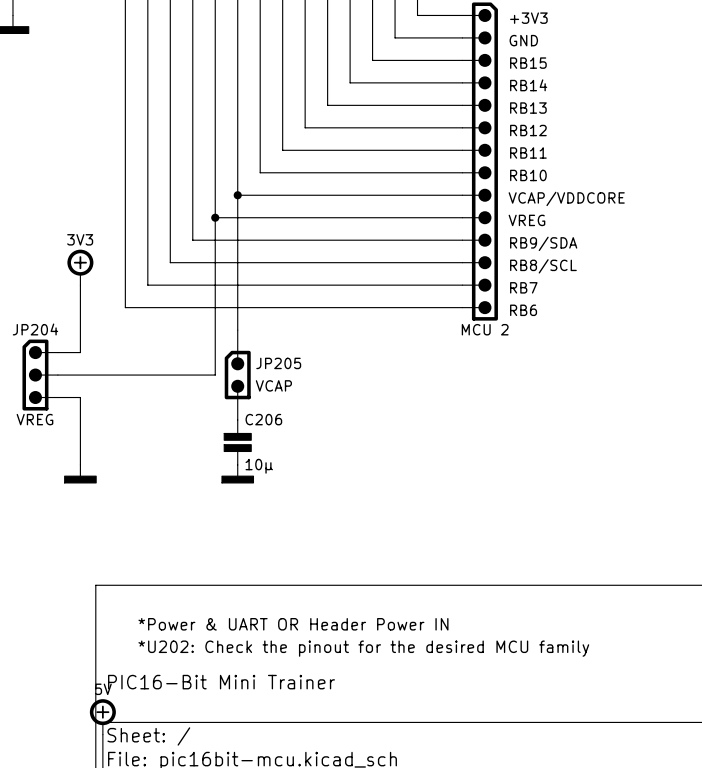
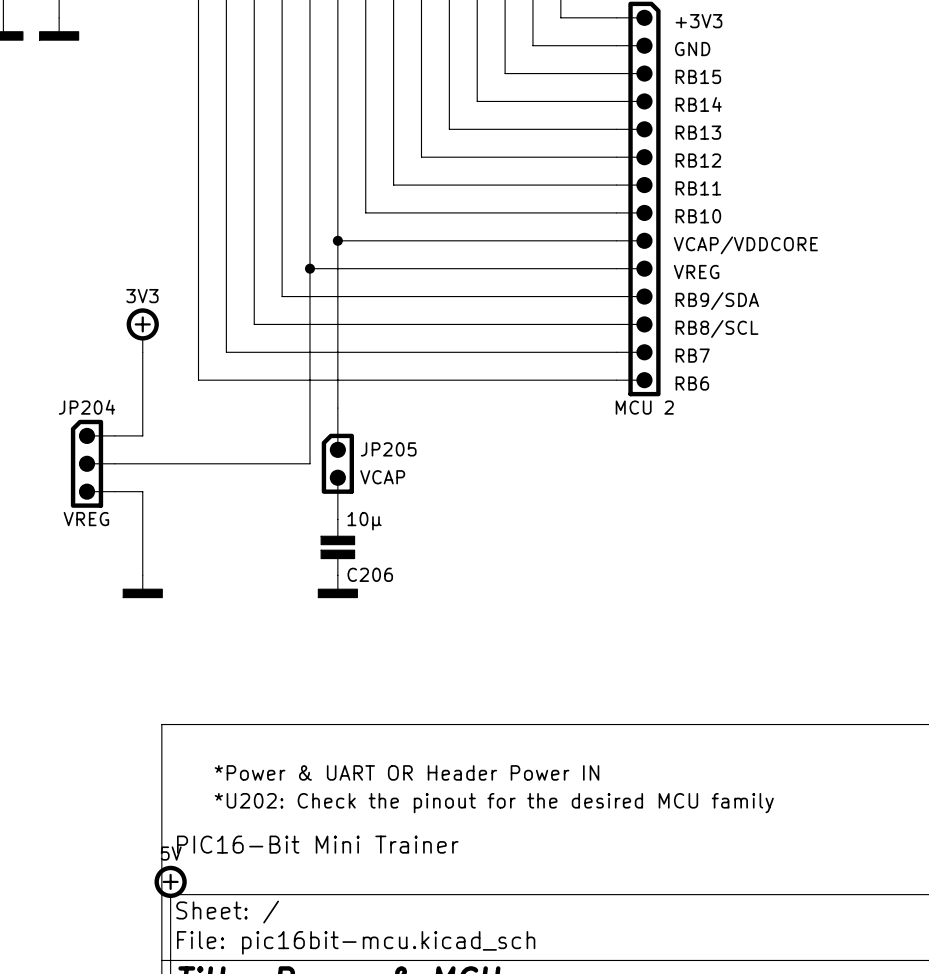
C206 name position: C206 (263, 419) -> C206 (370, 574)
C206 value position: 10µ (259, 466) -> 10µ (364, 521)

